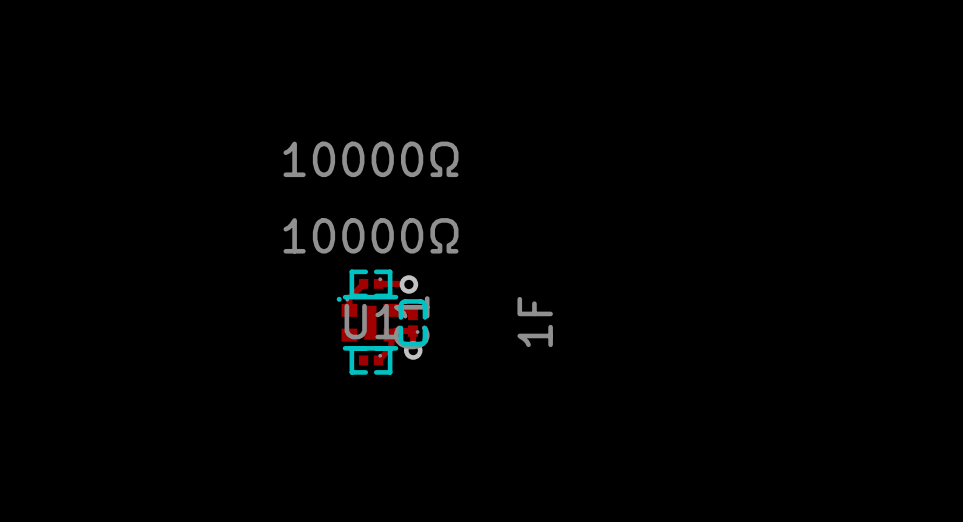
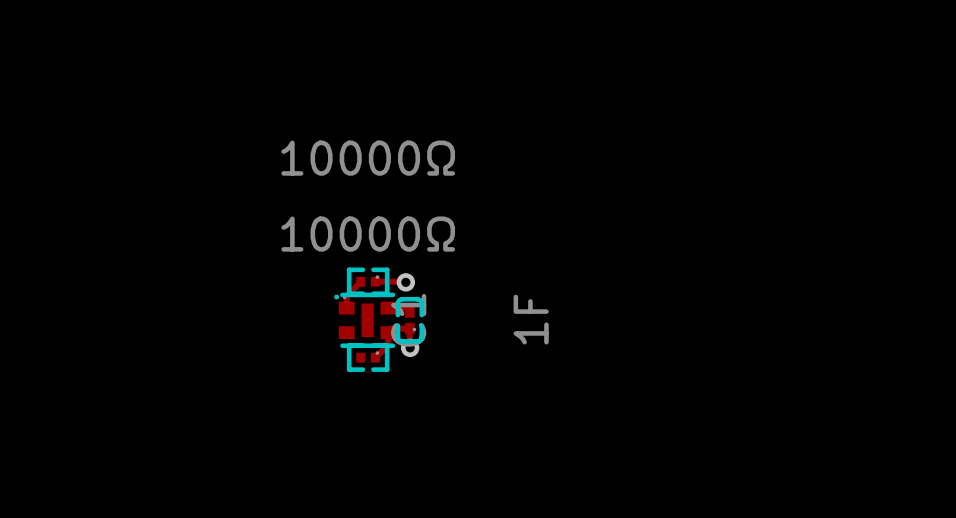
U1 name: U1 (371, 321) -> none

